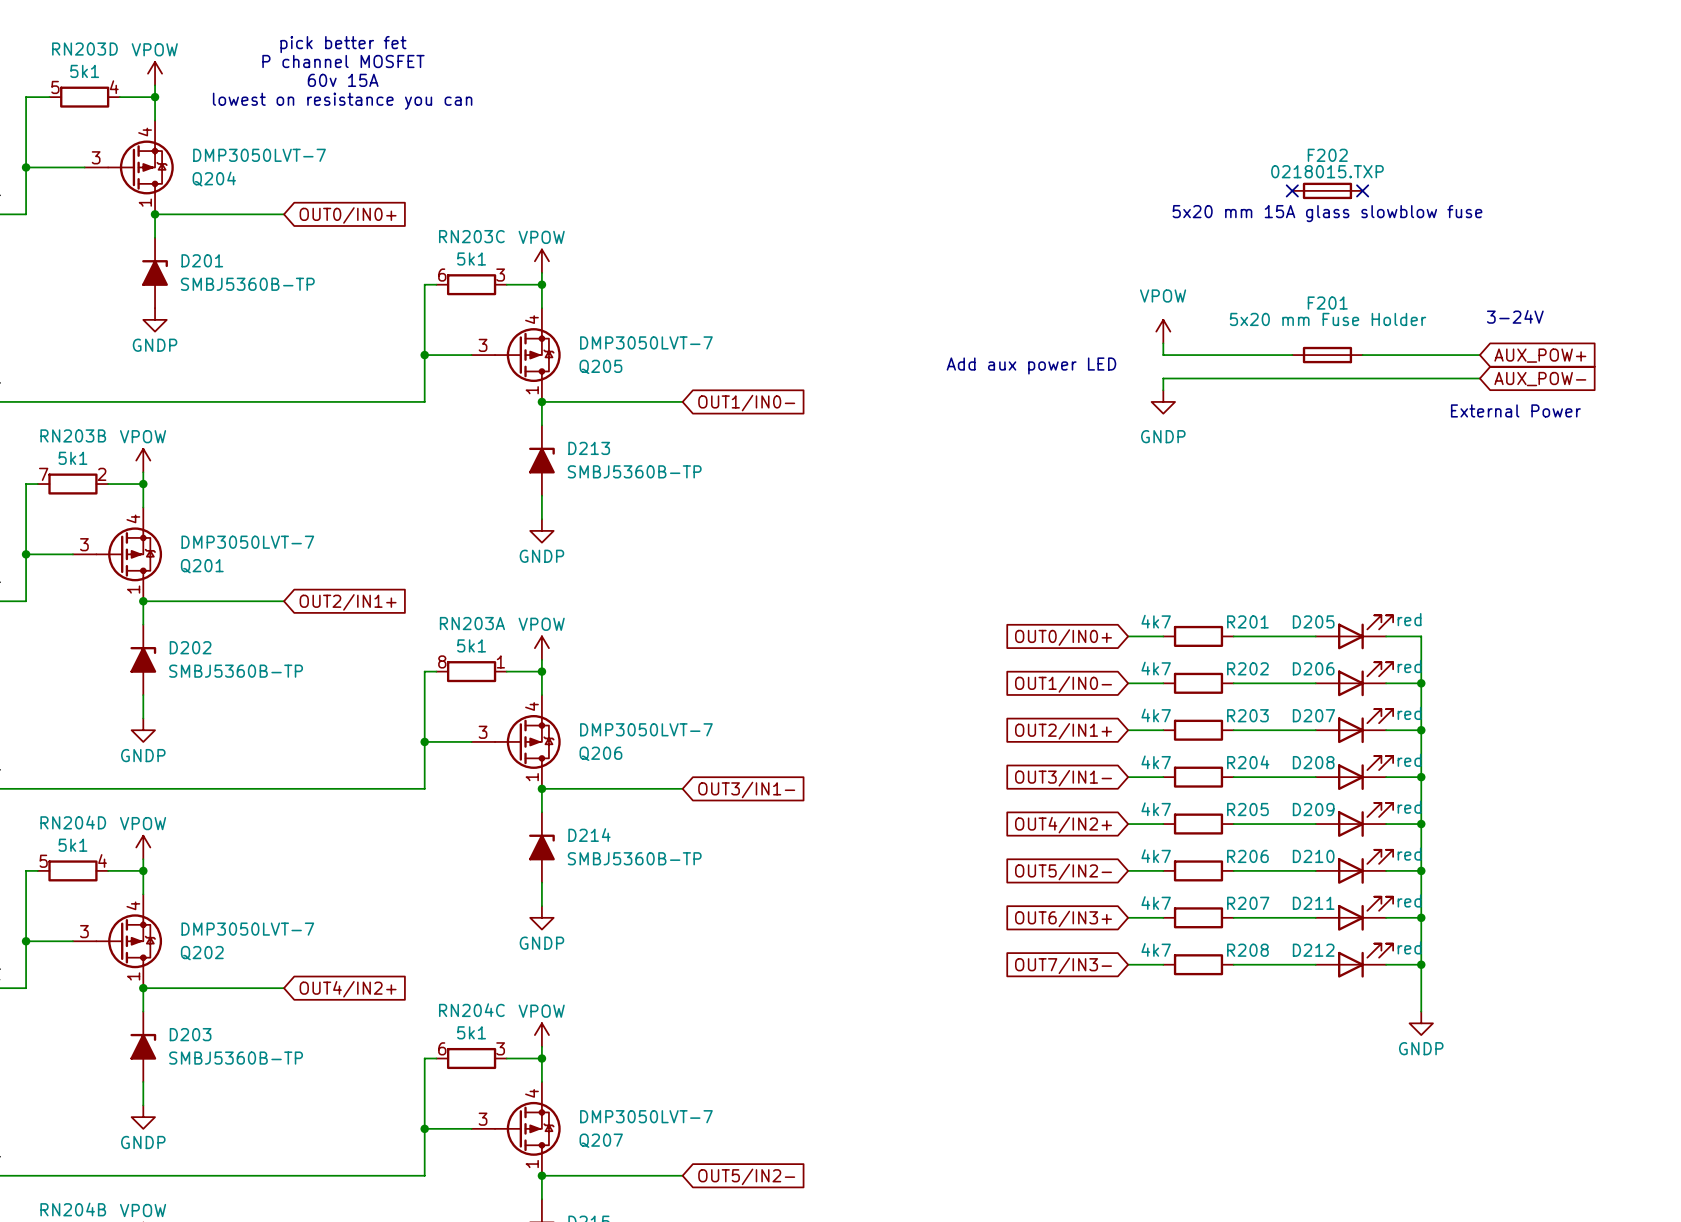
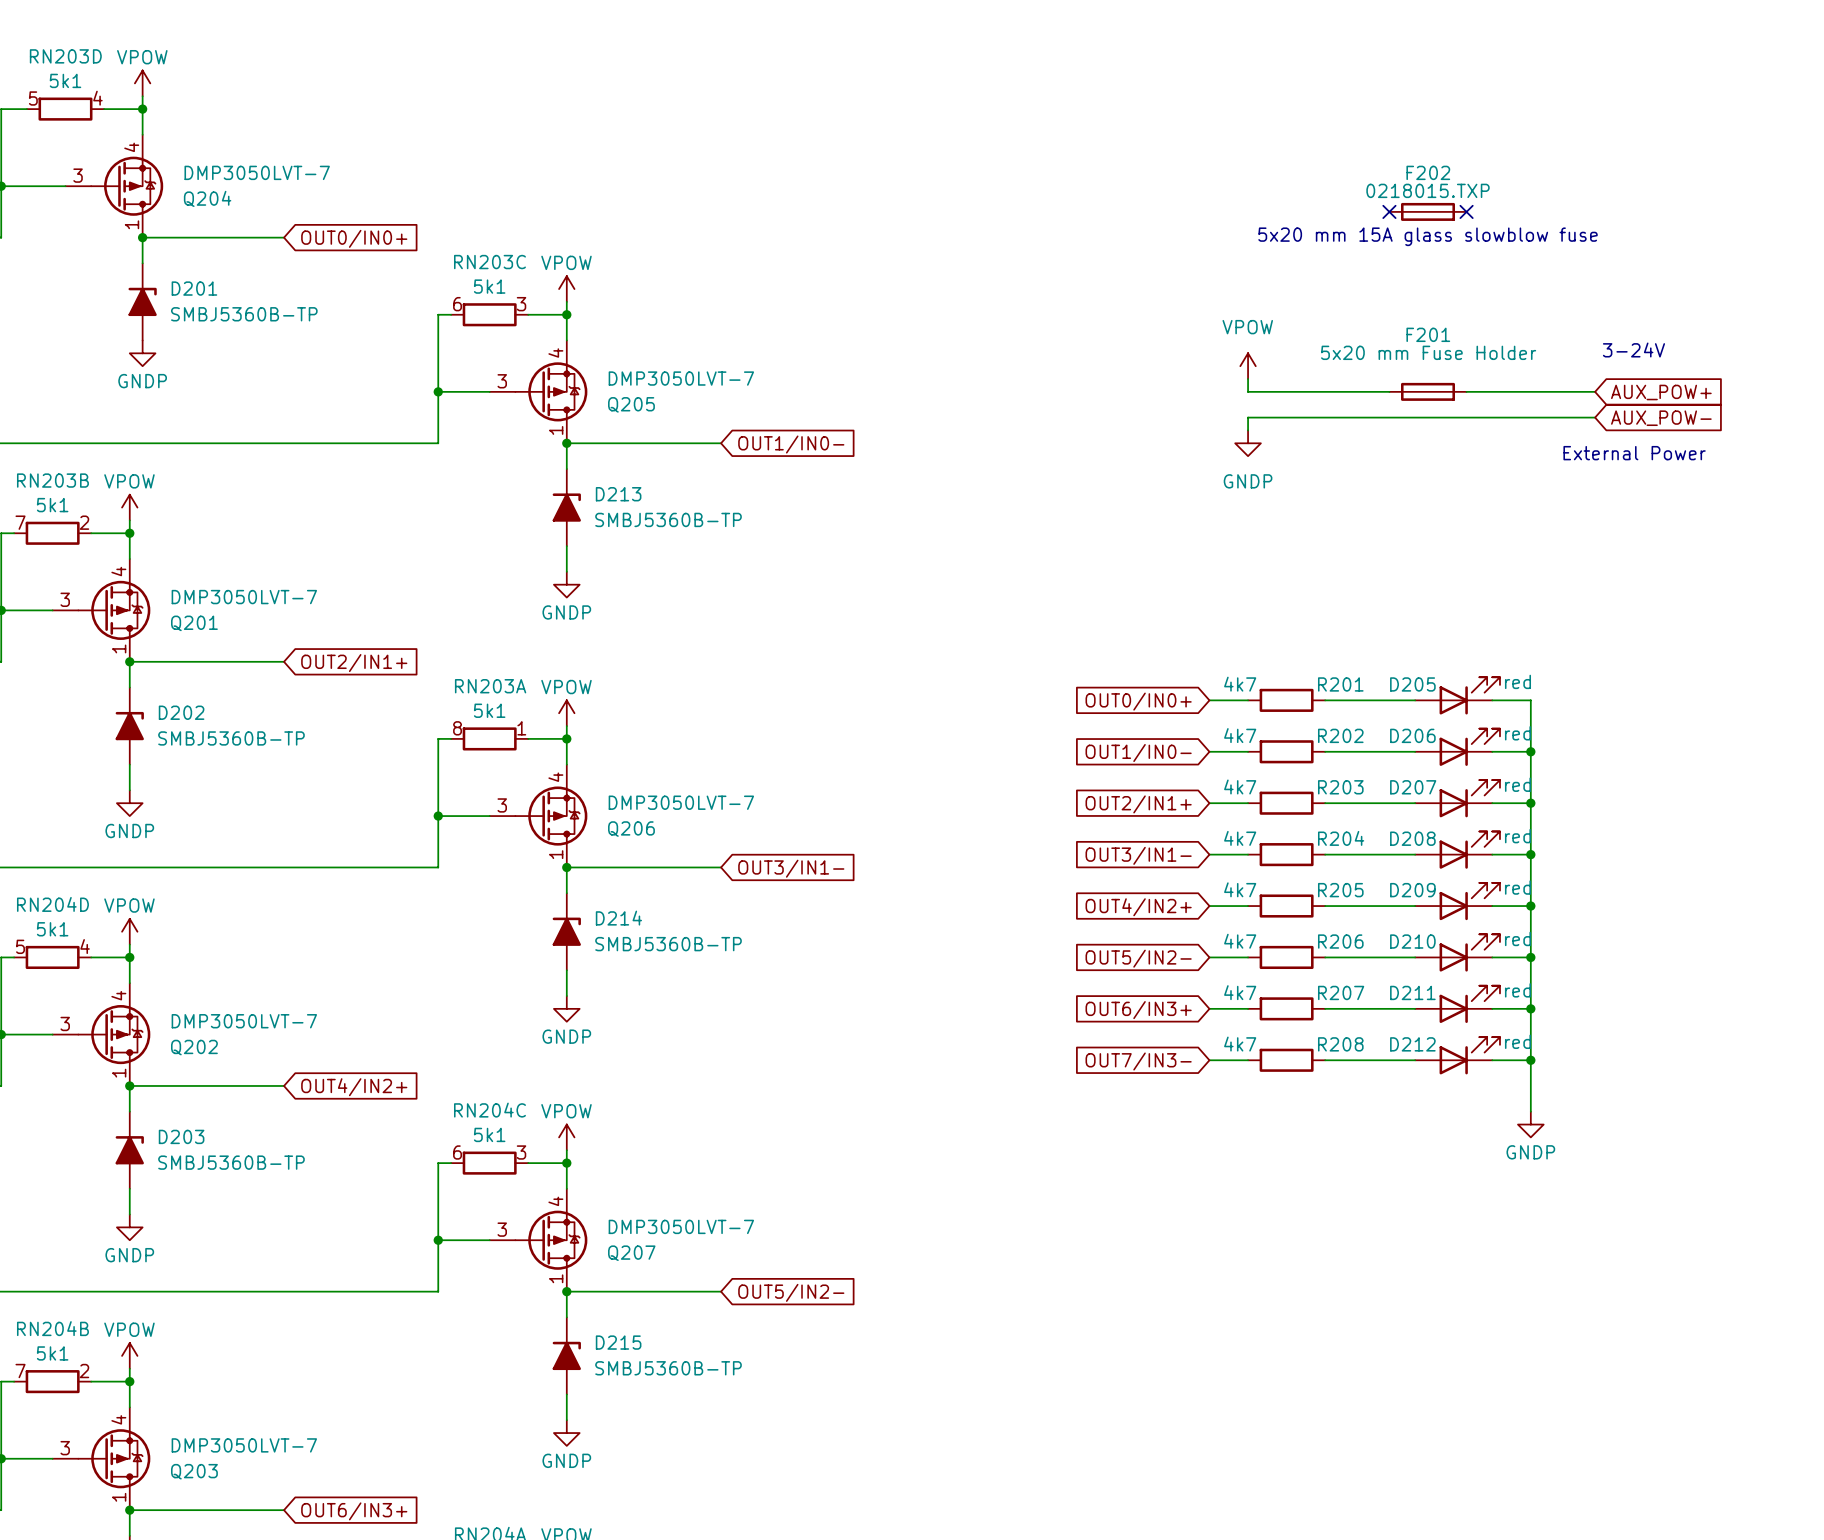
text: pick better fet (343, 44) -> none
text: P channel MOSFET (343, 61) -> none
text: 60v 15A (343, 80) -> none
text: lowest on resistance you can (342, 101) -> none
text: Add aux power LED (1031, 365) -> none

